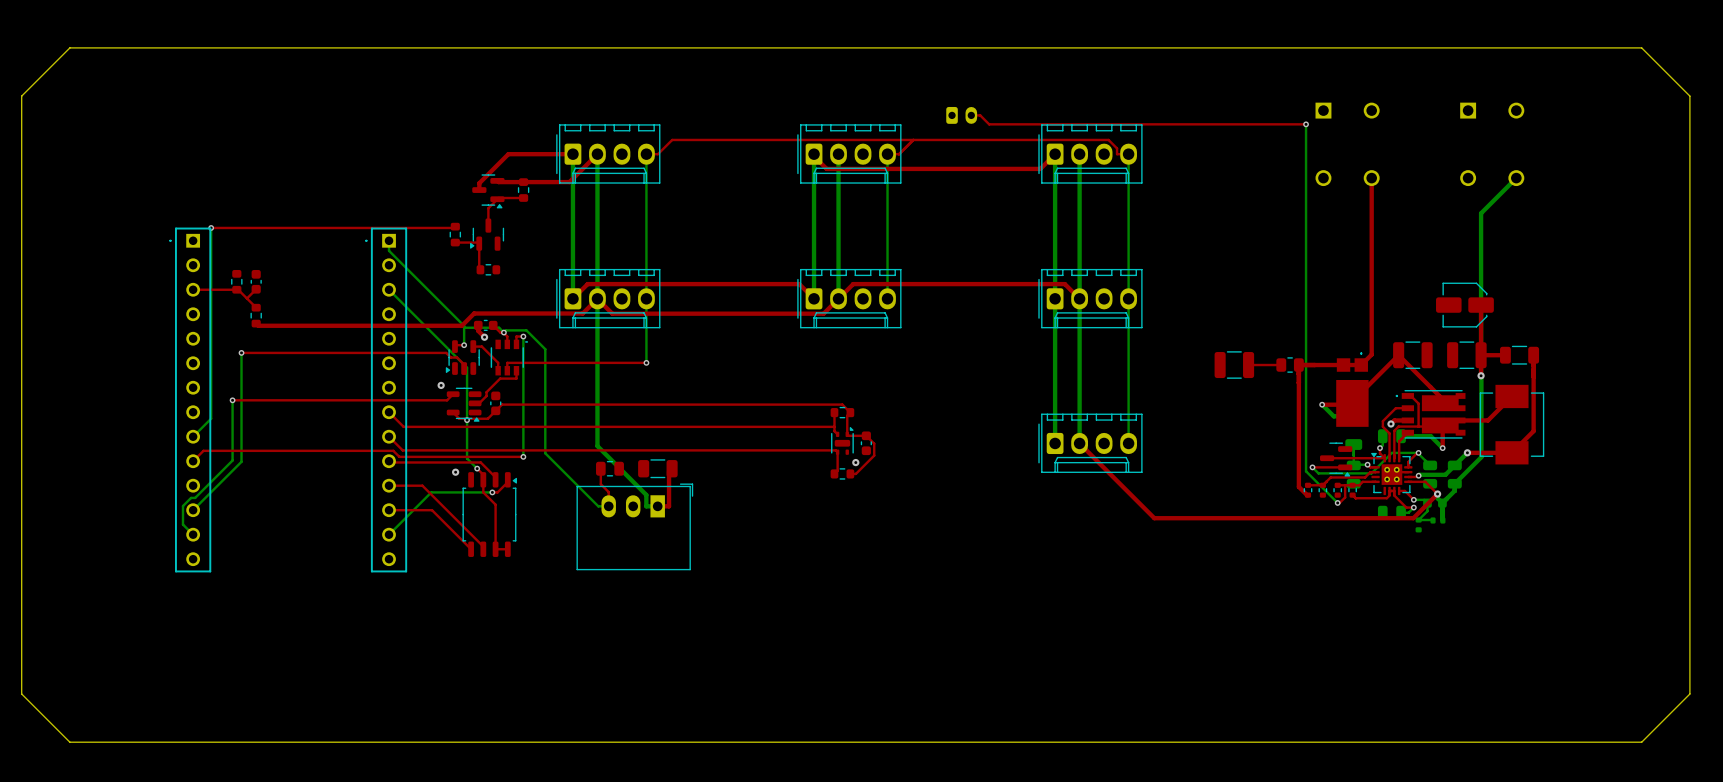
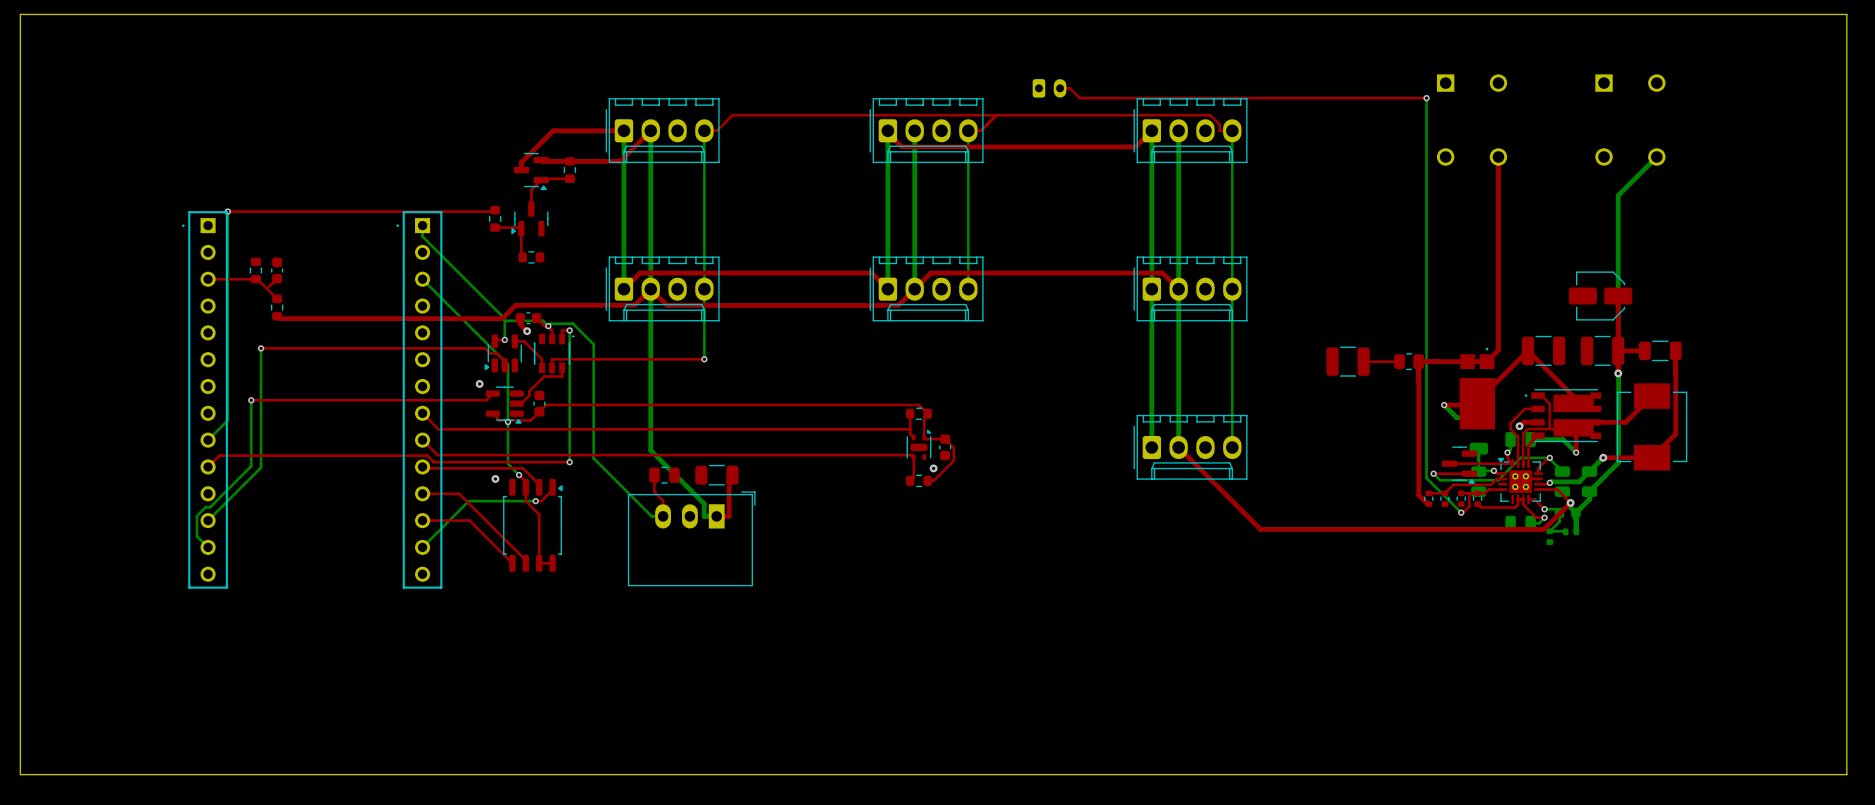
board edge: (69, 47) (21, 96) -> (73, 14) (20, 14) (20, 67)
board edge: (1641, 47) (1689, 96) -> (1794, 14) (1846, 14) (1846, 67)
board edge: (21, 693) (69, 742) -> (20, 721) (20, 774) (73, 774)
board edge: (1689, 693) (1641, 742) -> (1846, 721) (1846, 774) (1794, 774)

